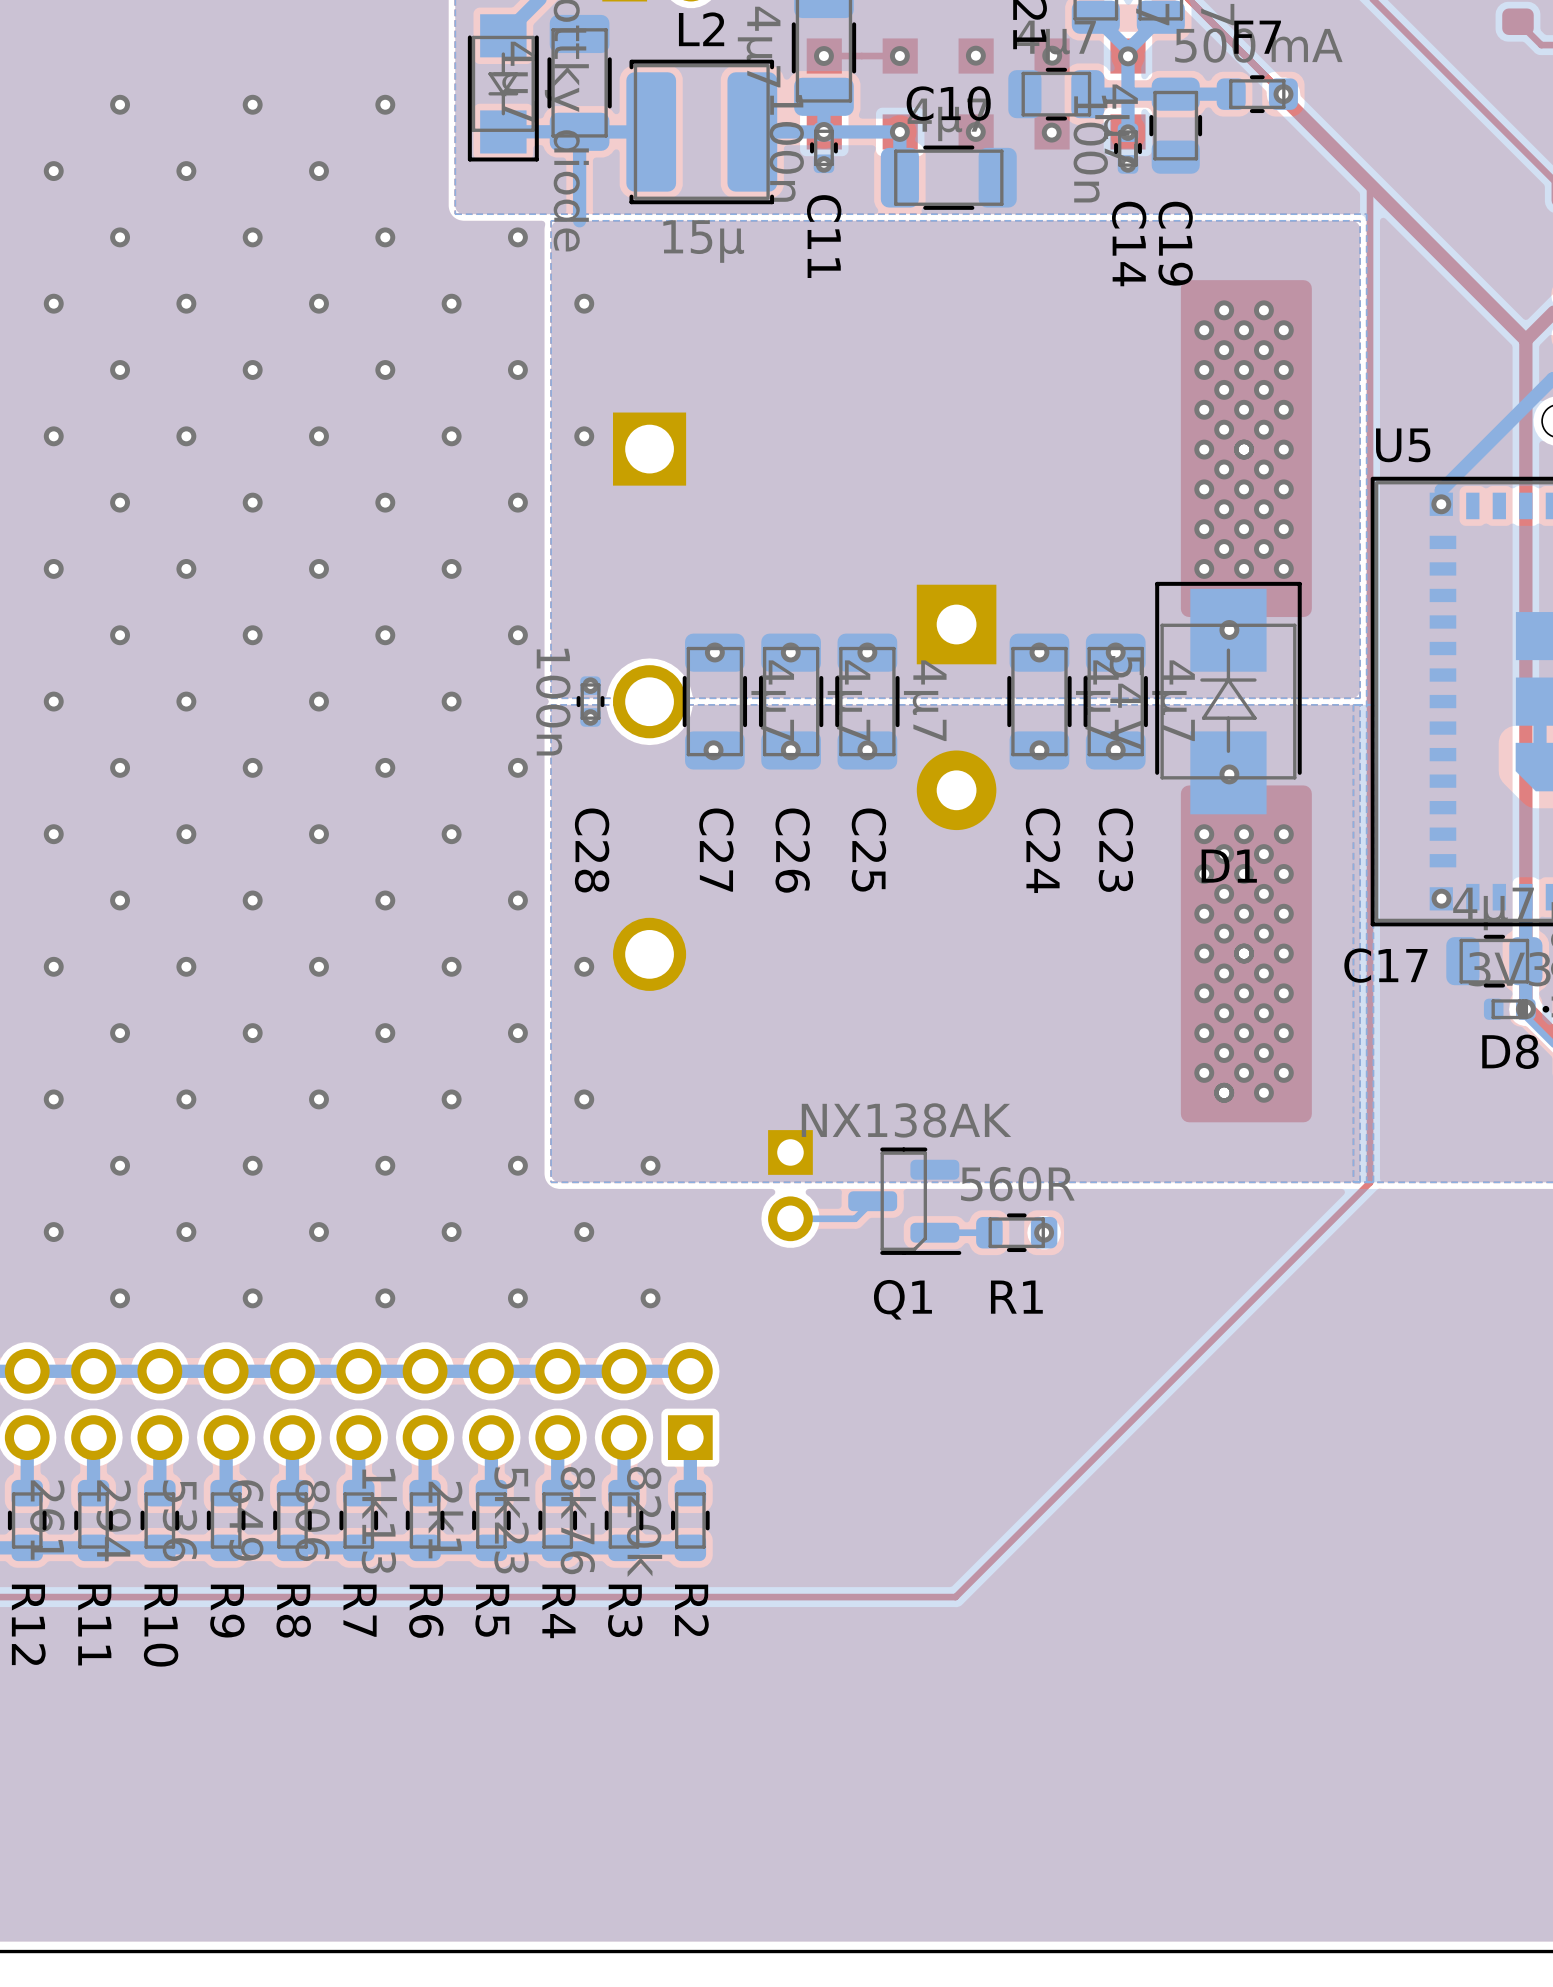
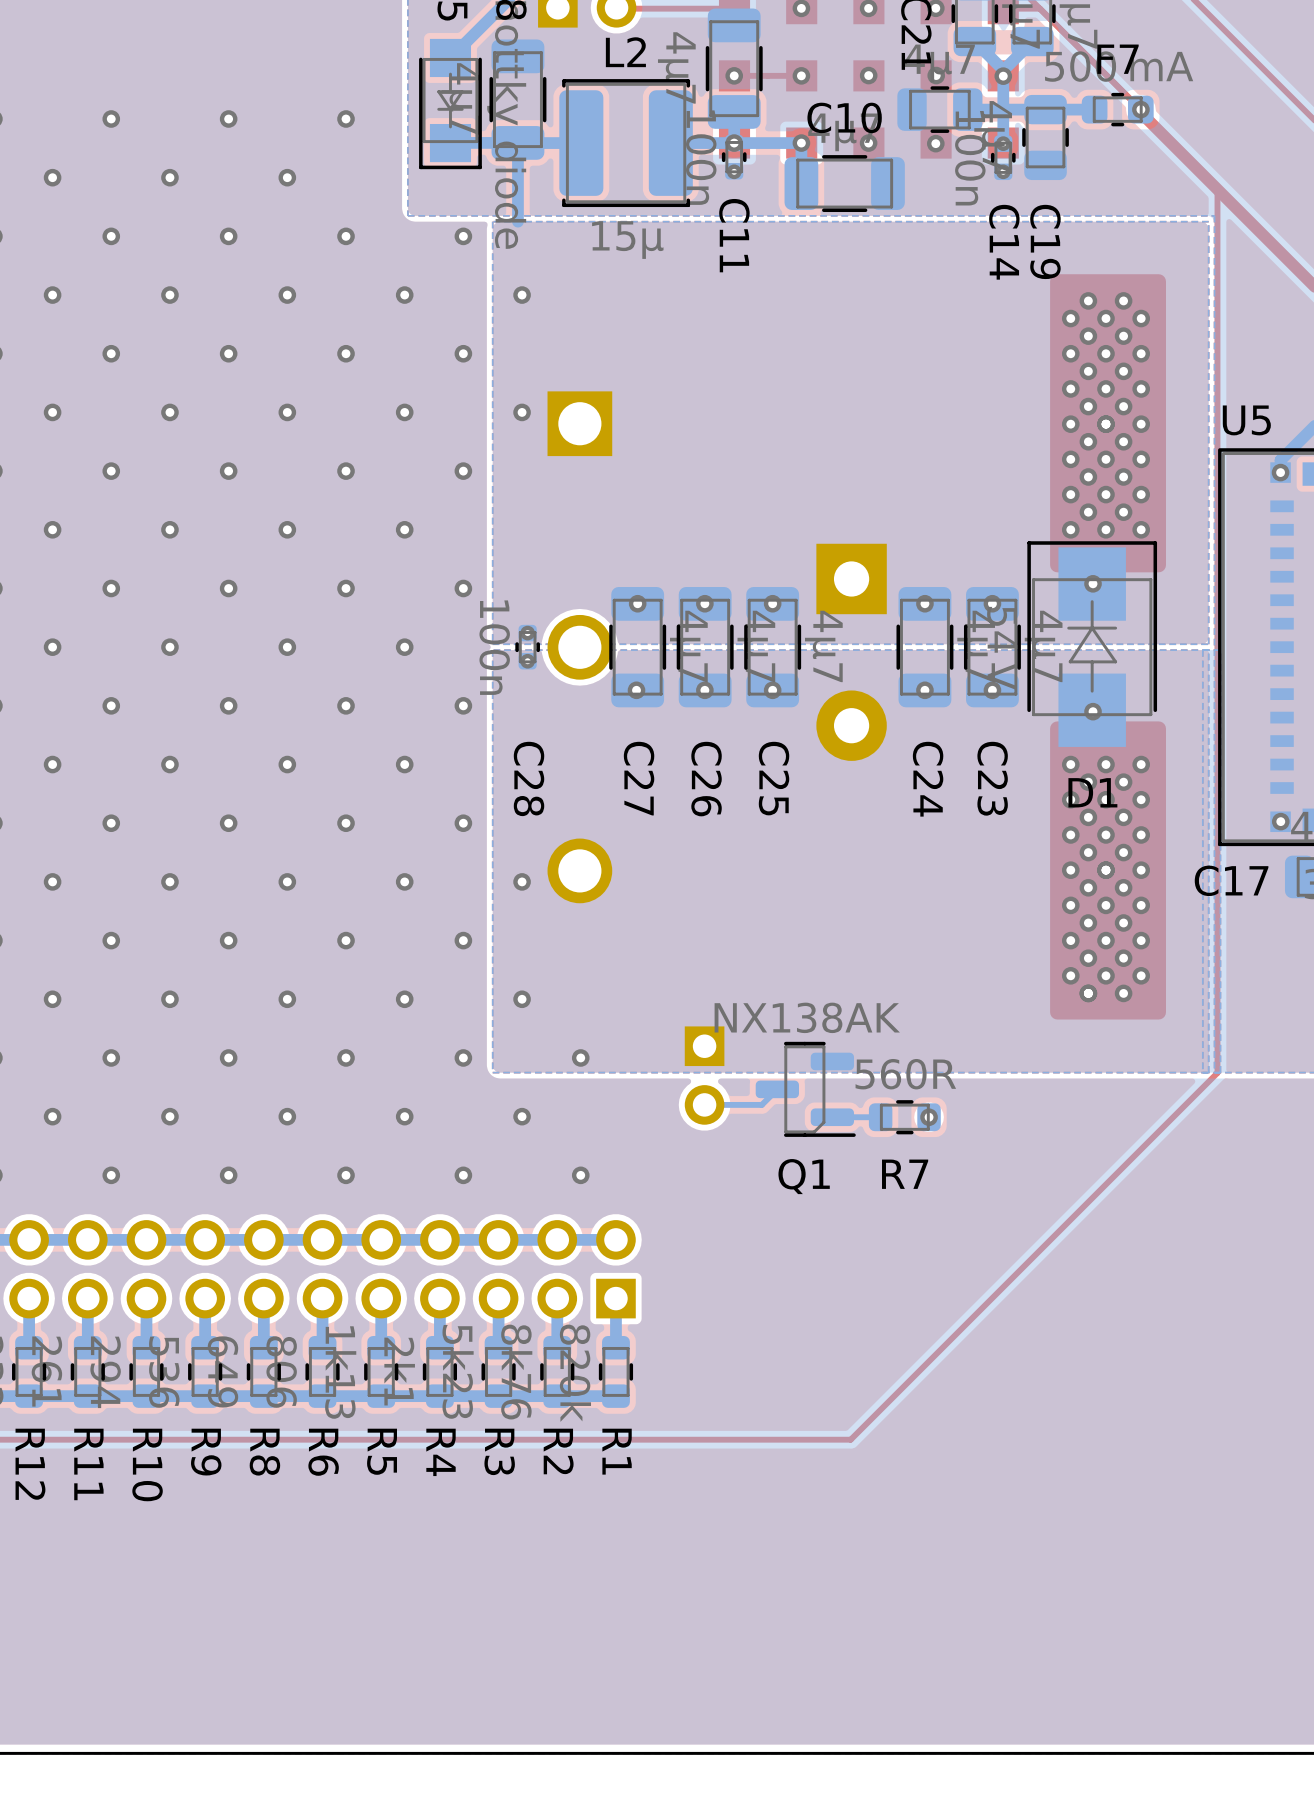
R1 name: R1 (1016, 1297) -> R7 (905, 1174)
R7 name: R7 (360, 1610) -> R6 (323, 1452)
R5 name: R5 (492, 1610) -> R4 (441, 1452)
R3 name: R3 (625, 1610) -> R2 (558, 1451)
R2 name: R2 (691, 1610) -> R1 (617, 1451)
R6 name: R6 (426, 1611) -> R5 (382, 1451)
R4 name: R4 (558, 1611) -> R3 (499, 1451)

